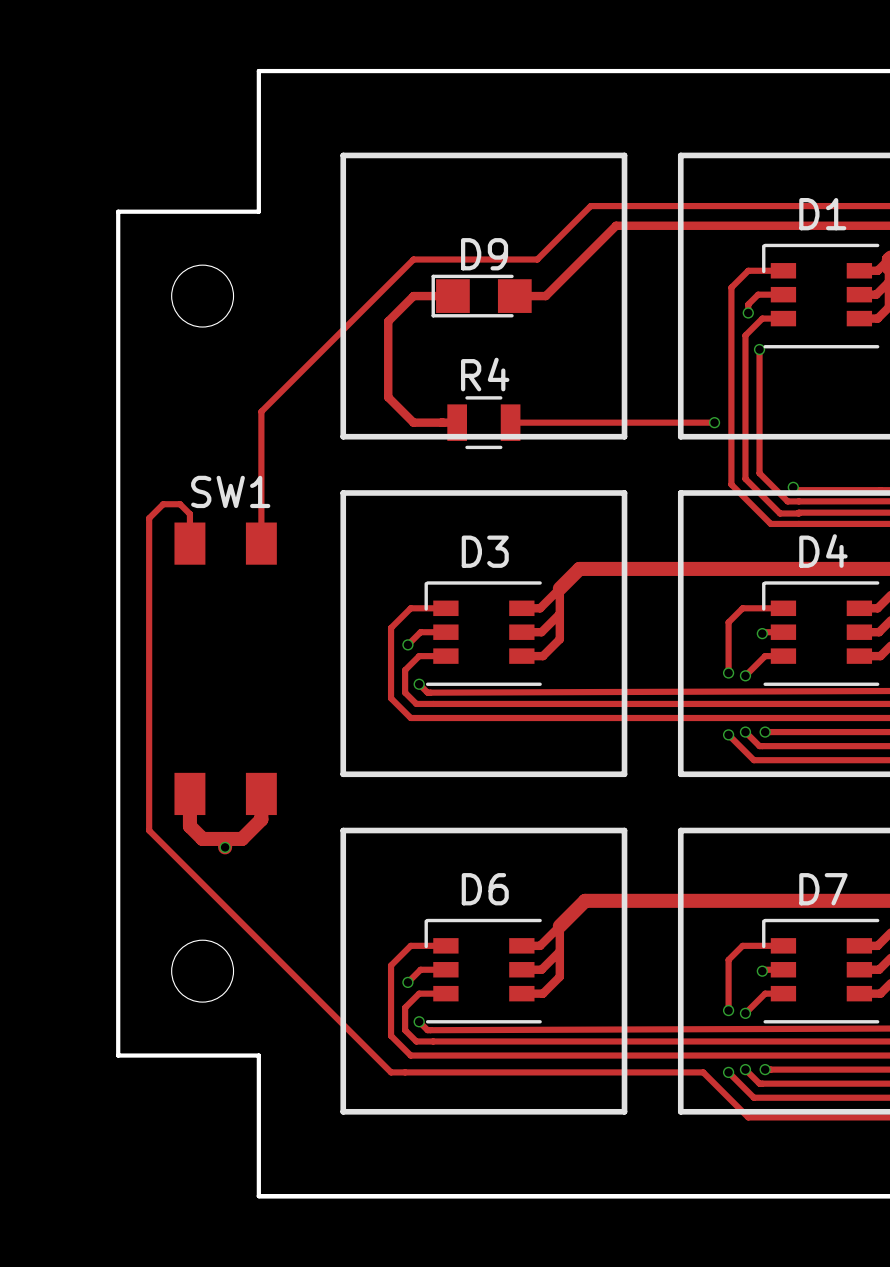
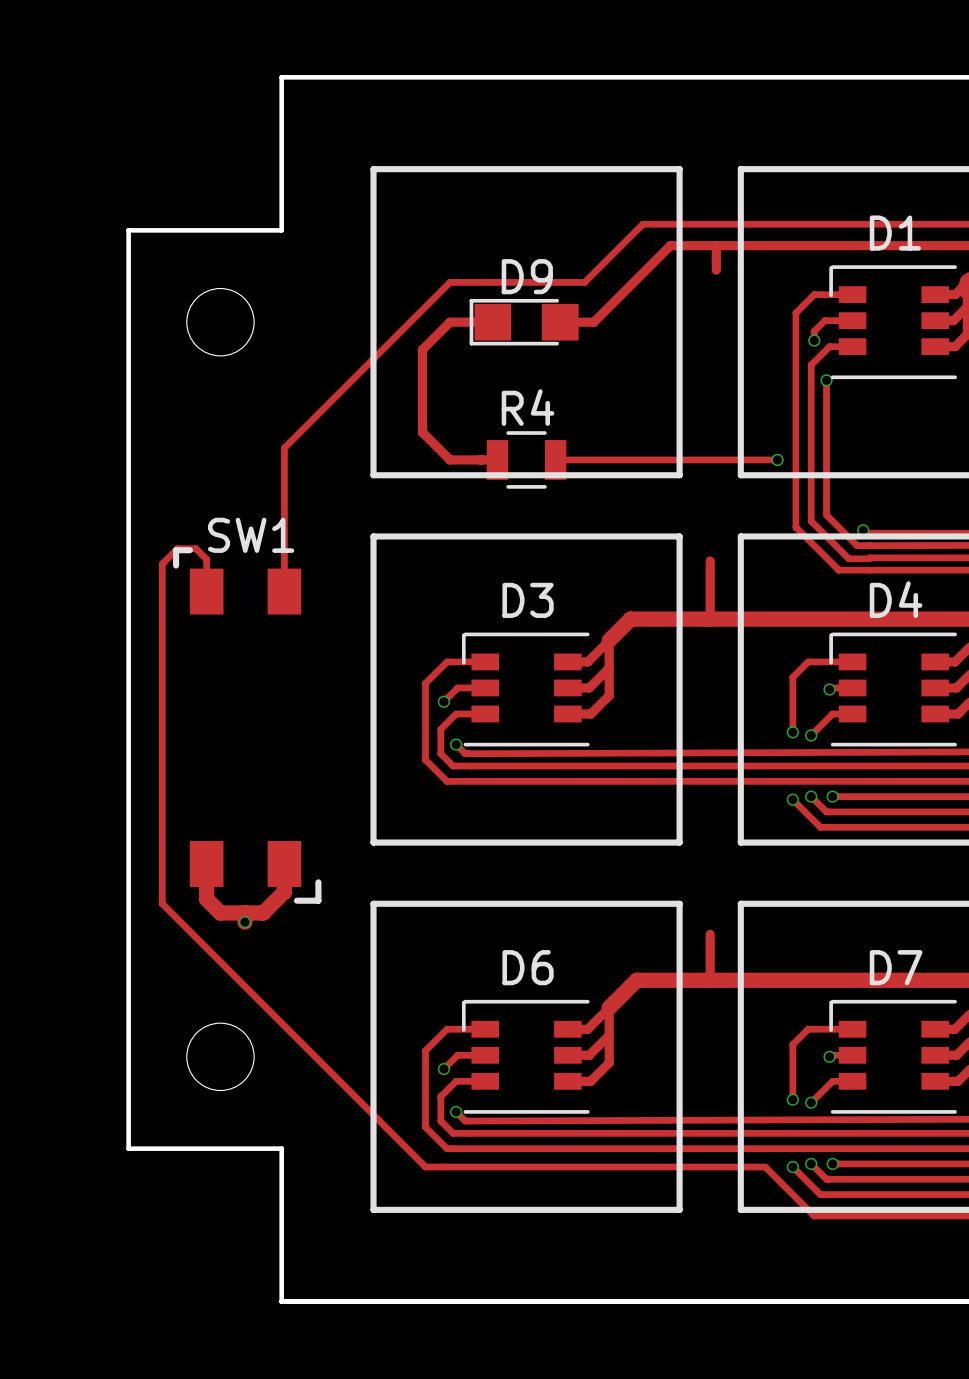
track: none -> (716, 245) (716, 270)
line: none -> (189, 550) (176, 550) (176, 565)
track: none -> (710, 560) (710, 619)
line: none -> (318, 882) (318, 900) (296, 900)
track: none -> (710, 934) (710, 980)

